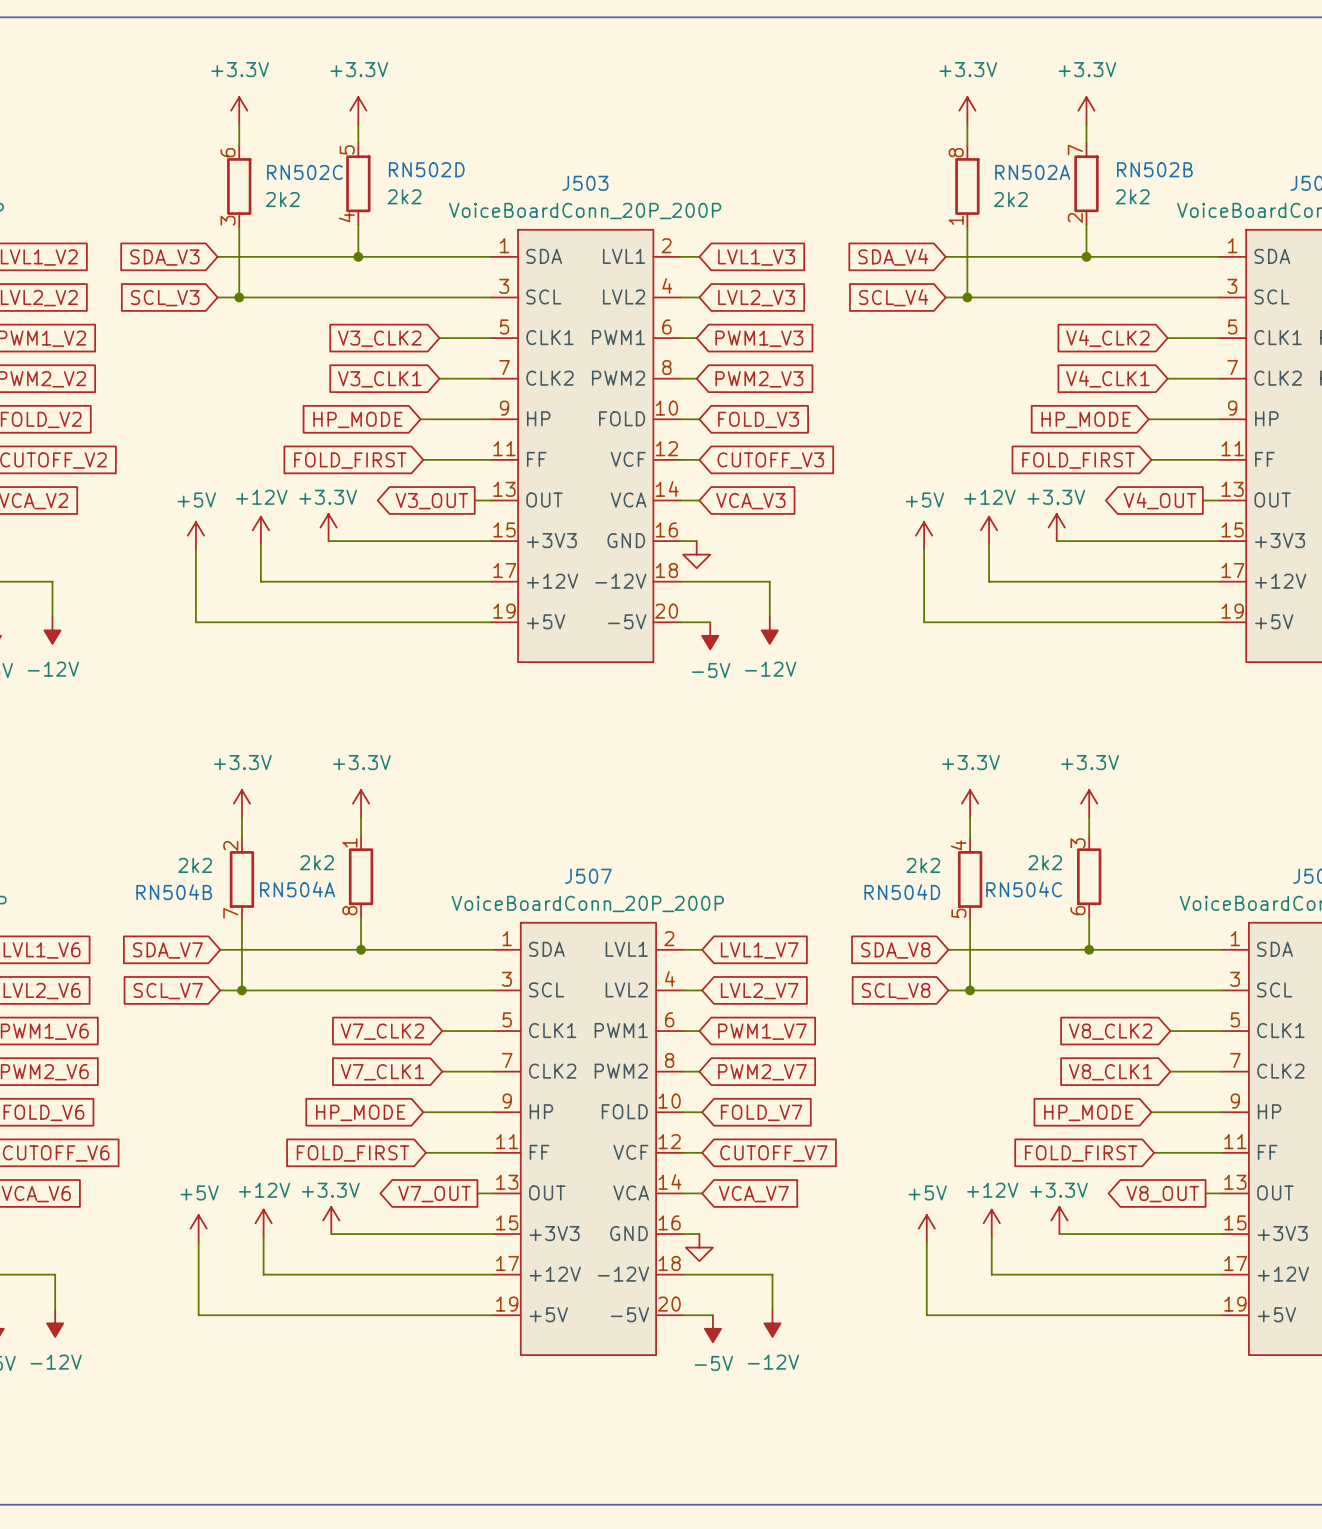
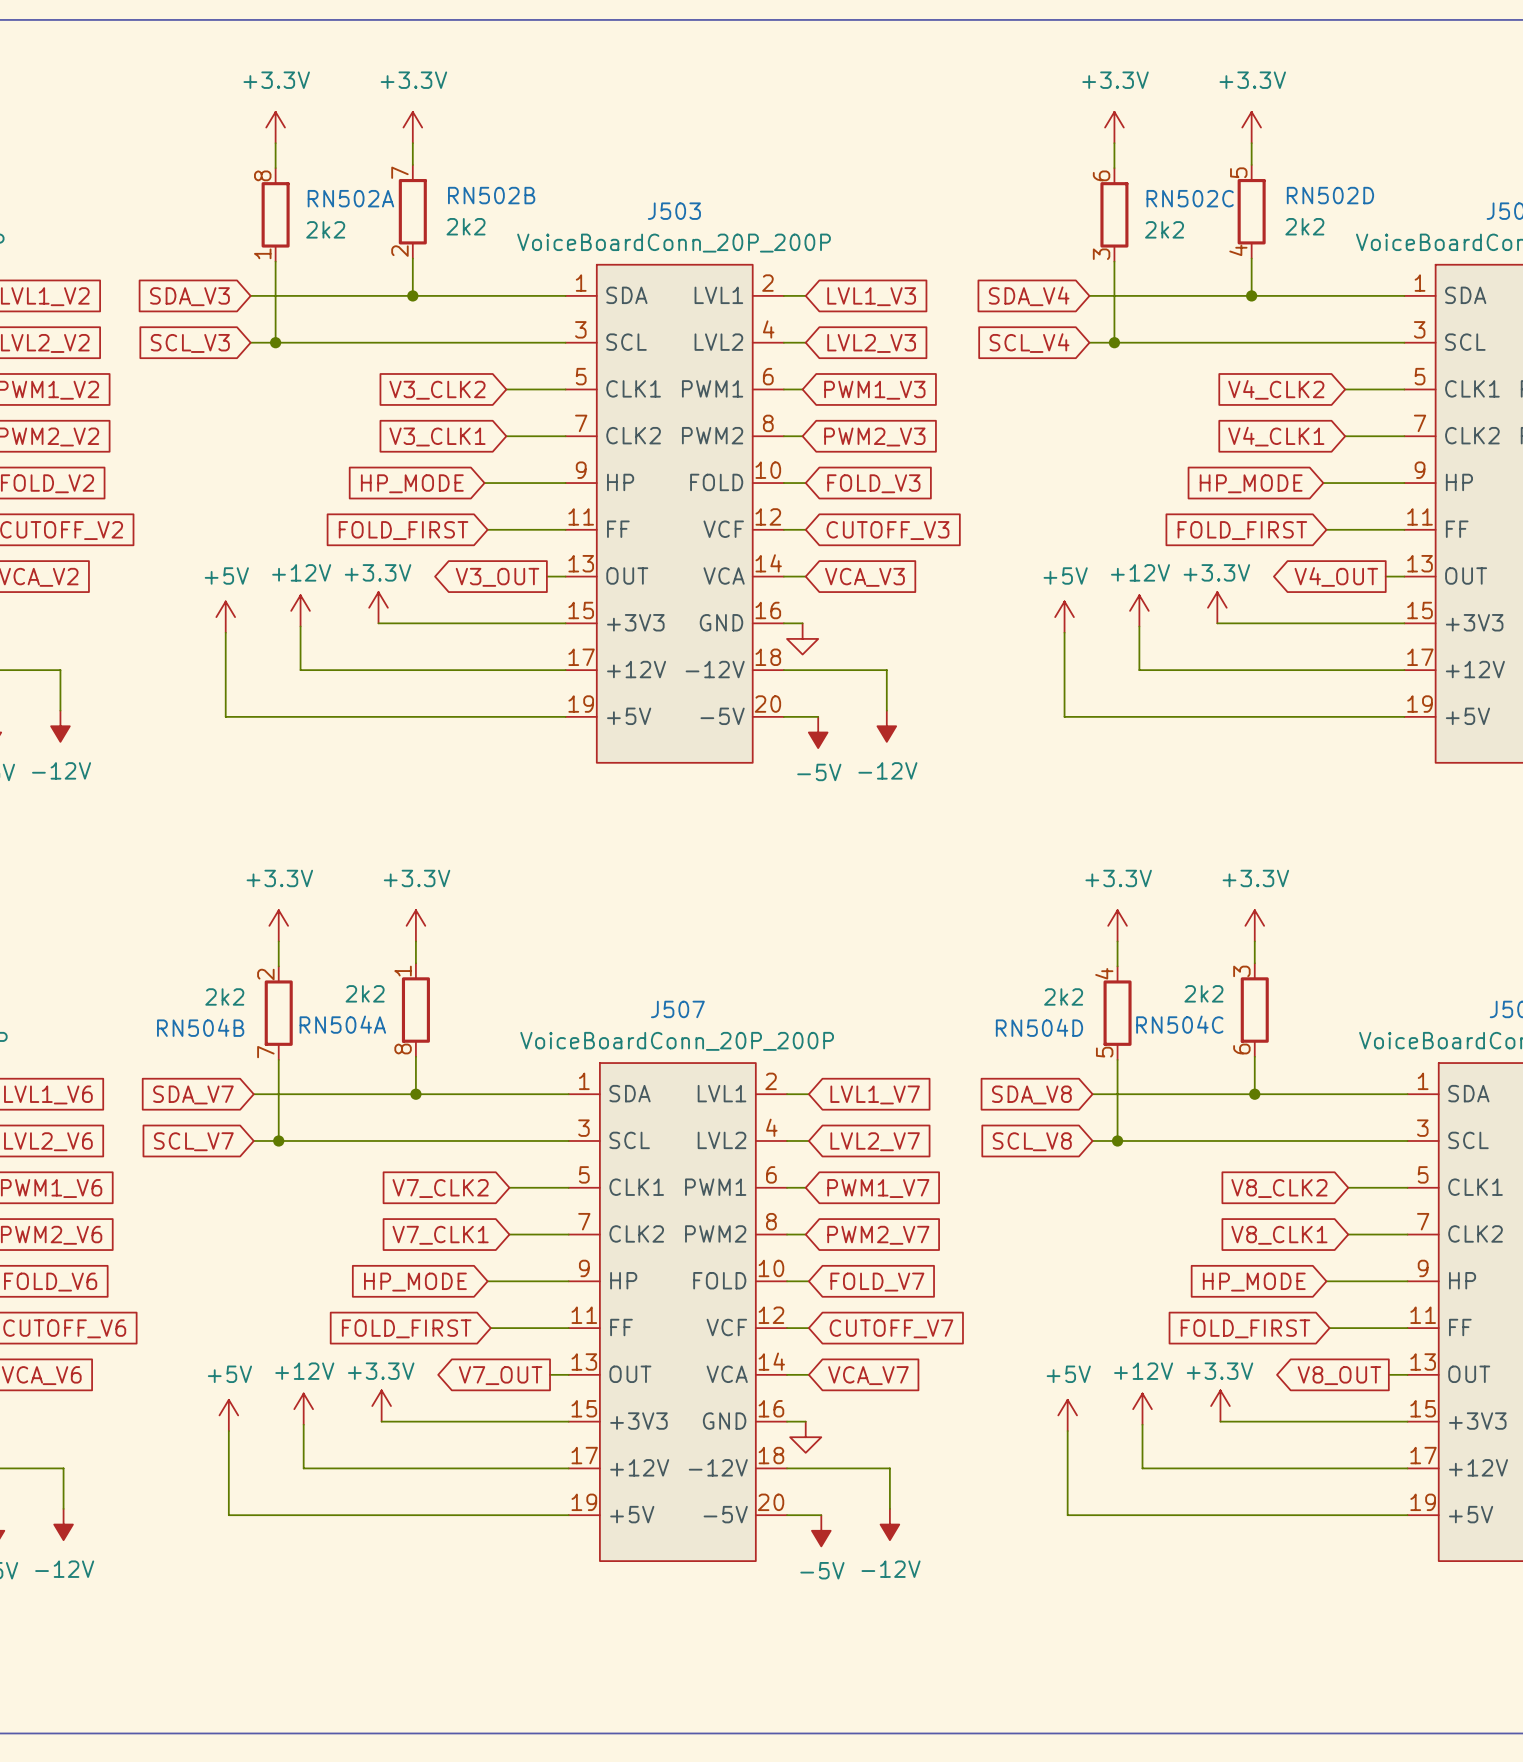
RN502D position: (358, 183) -> (1251, 211)
RN502B position: (1086, 183) -> (412, 211)
RN502C position: (239, 186) -> (1114, 214)
RN502A position: (967, 186) -> (275, 214)

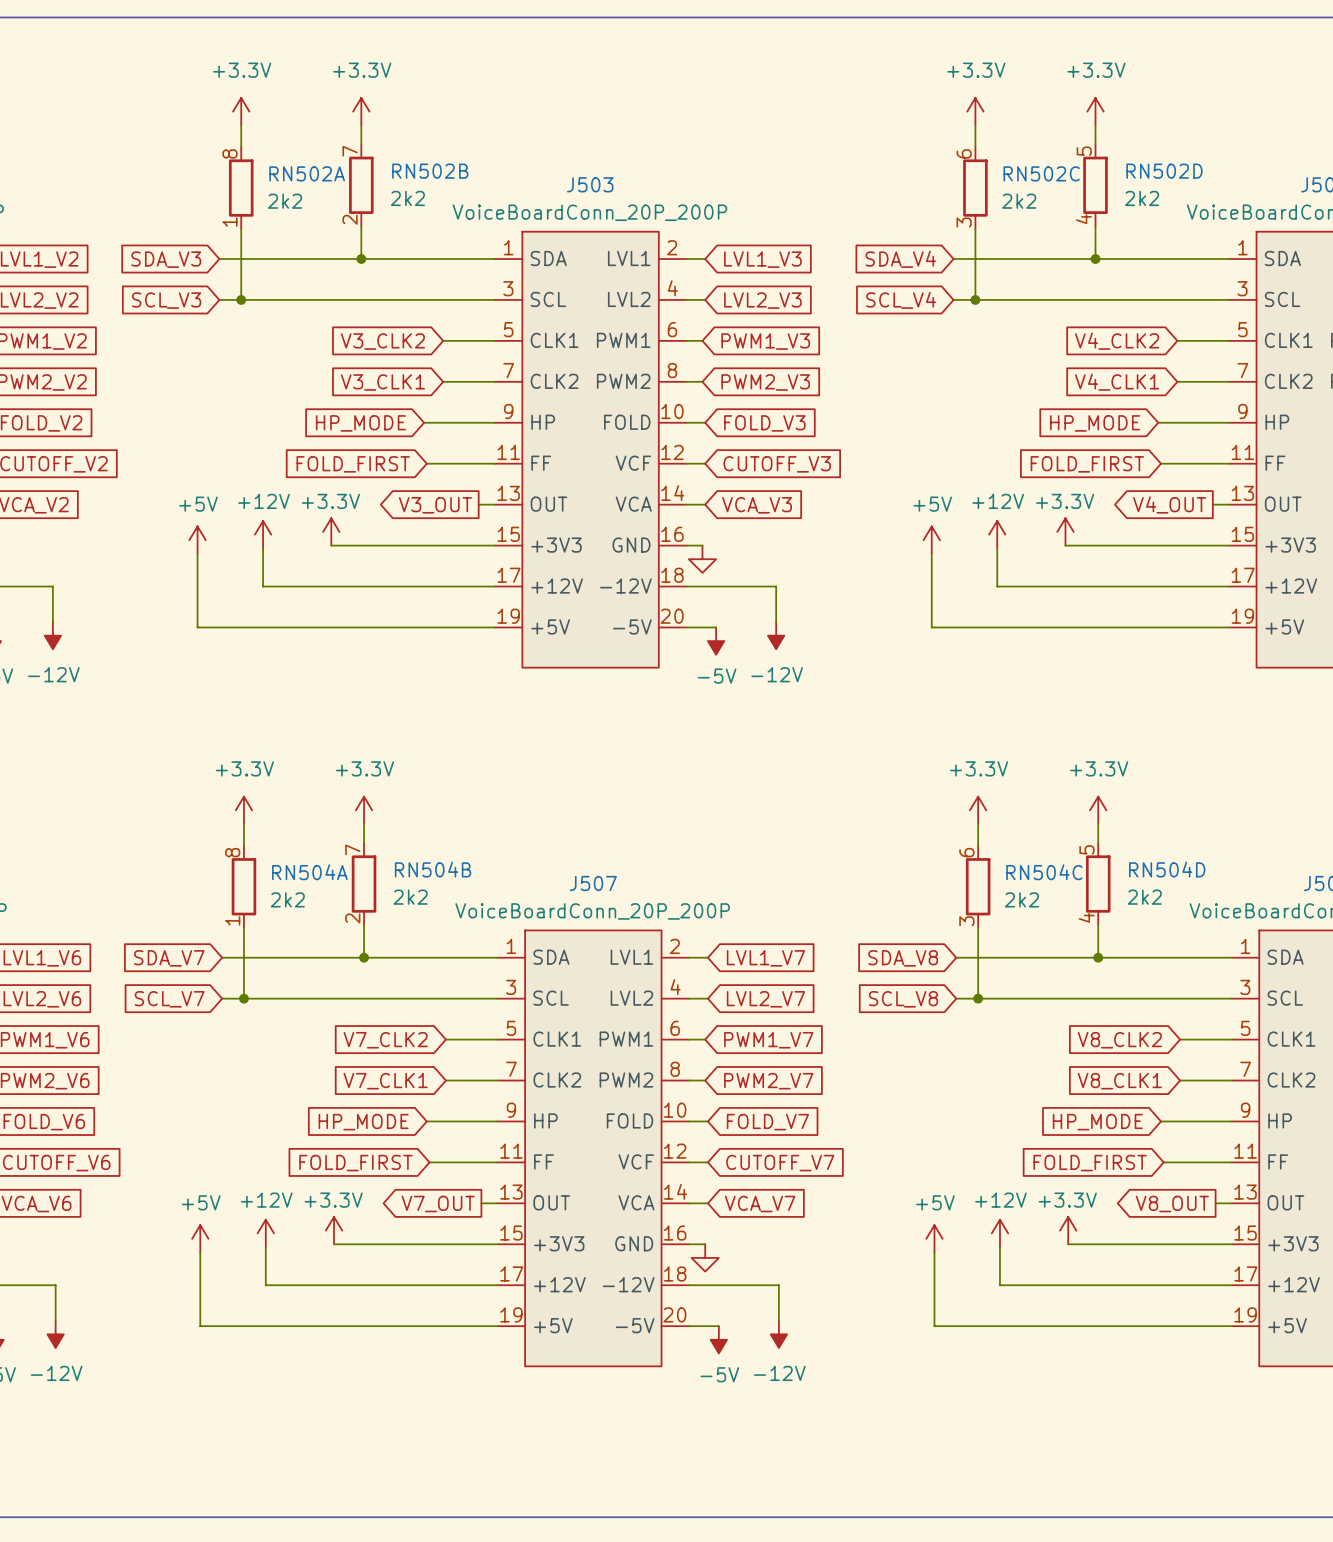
RN504A rotation: 0° (415, 1010) -> 180° (243, 886)
RN504A position: (415, 1010) -> (243, 886)
RN504C rotation: 0° (1254, 1010) -> 180° (978, 886)
RN504C position: (1254, 1010) -> (978, 886)
RN504B rotation: 0° (278, 1013) -> 180° (364, 884)
RN504B position: (278, 1013) -> (364, 884)
RN504D rotation: 0° (1117, 1013) -> 180° (1098, 884)
RN504D position: (1117, 1013) -> (1098, 884)

